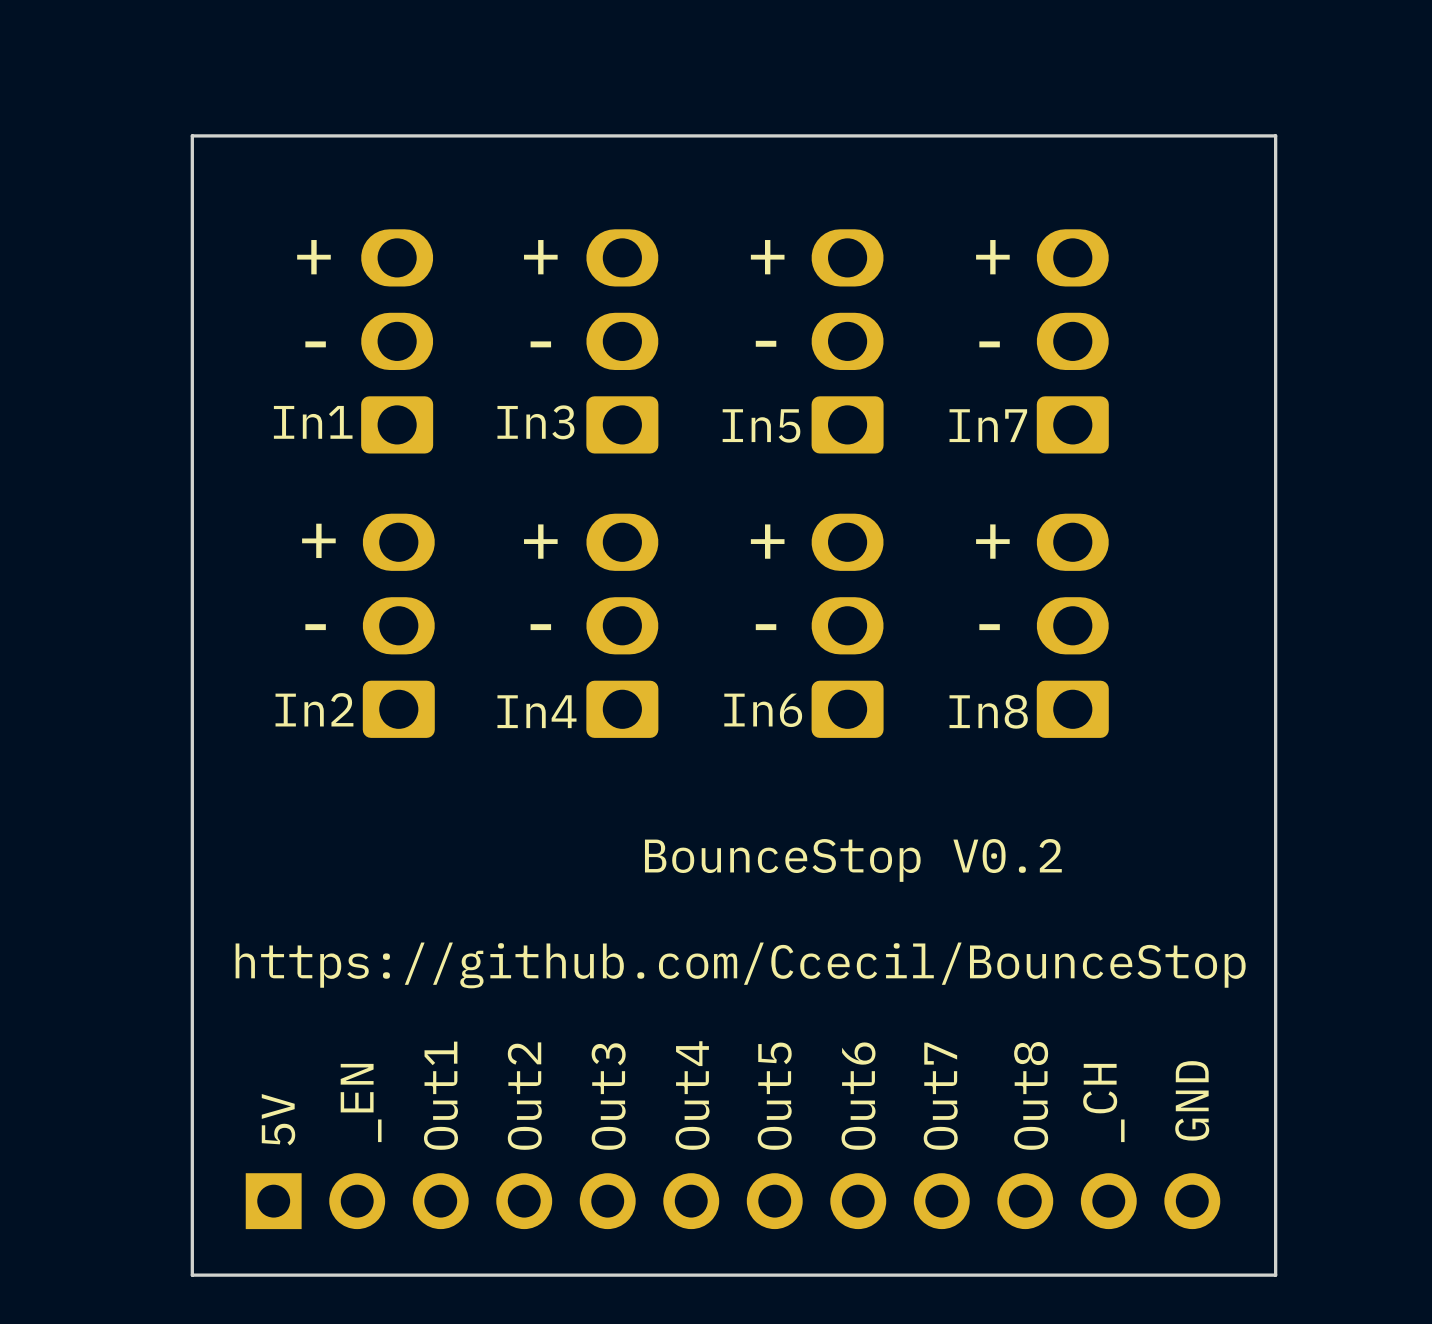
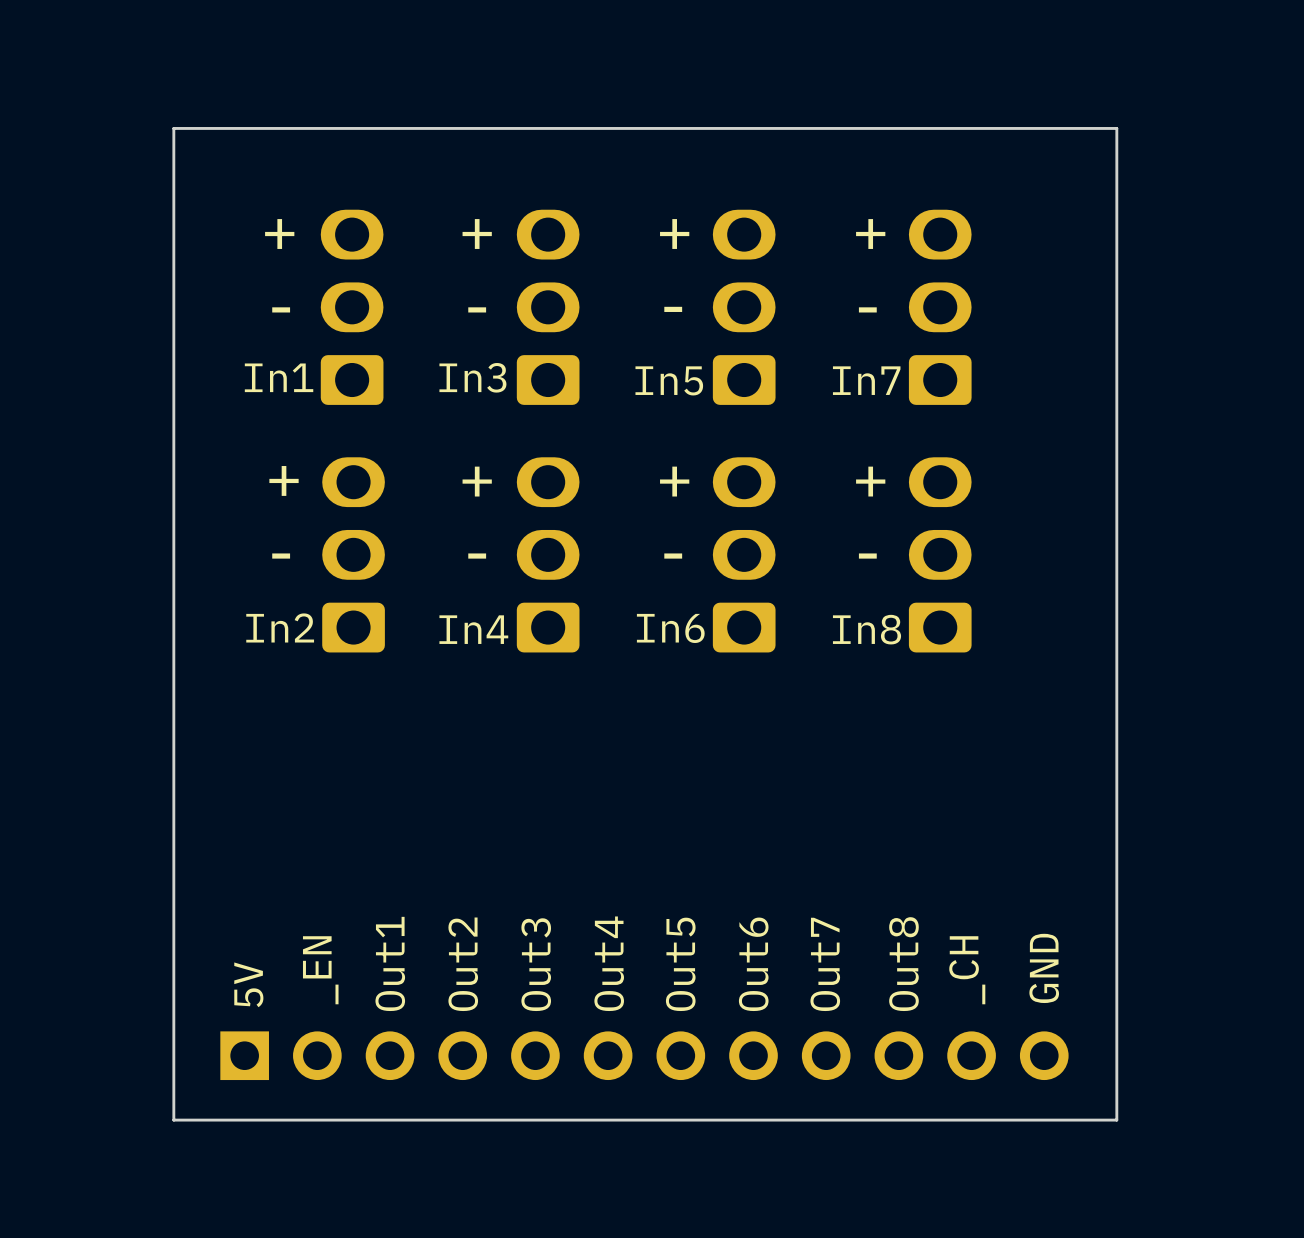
text: BounceStop V0.2 (853, 860) -> none
text: https://github.com/Ccecil/BounceStop (740, 965) -> none

